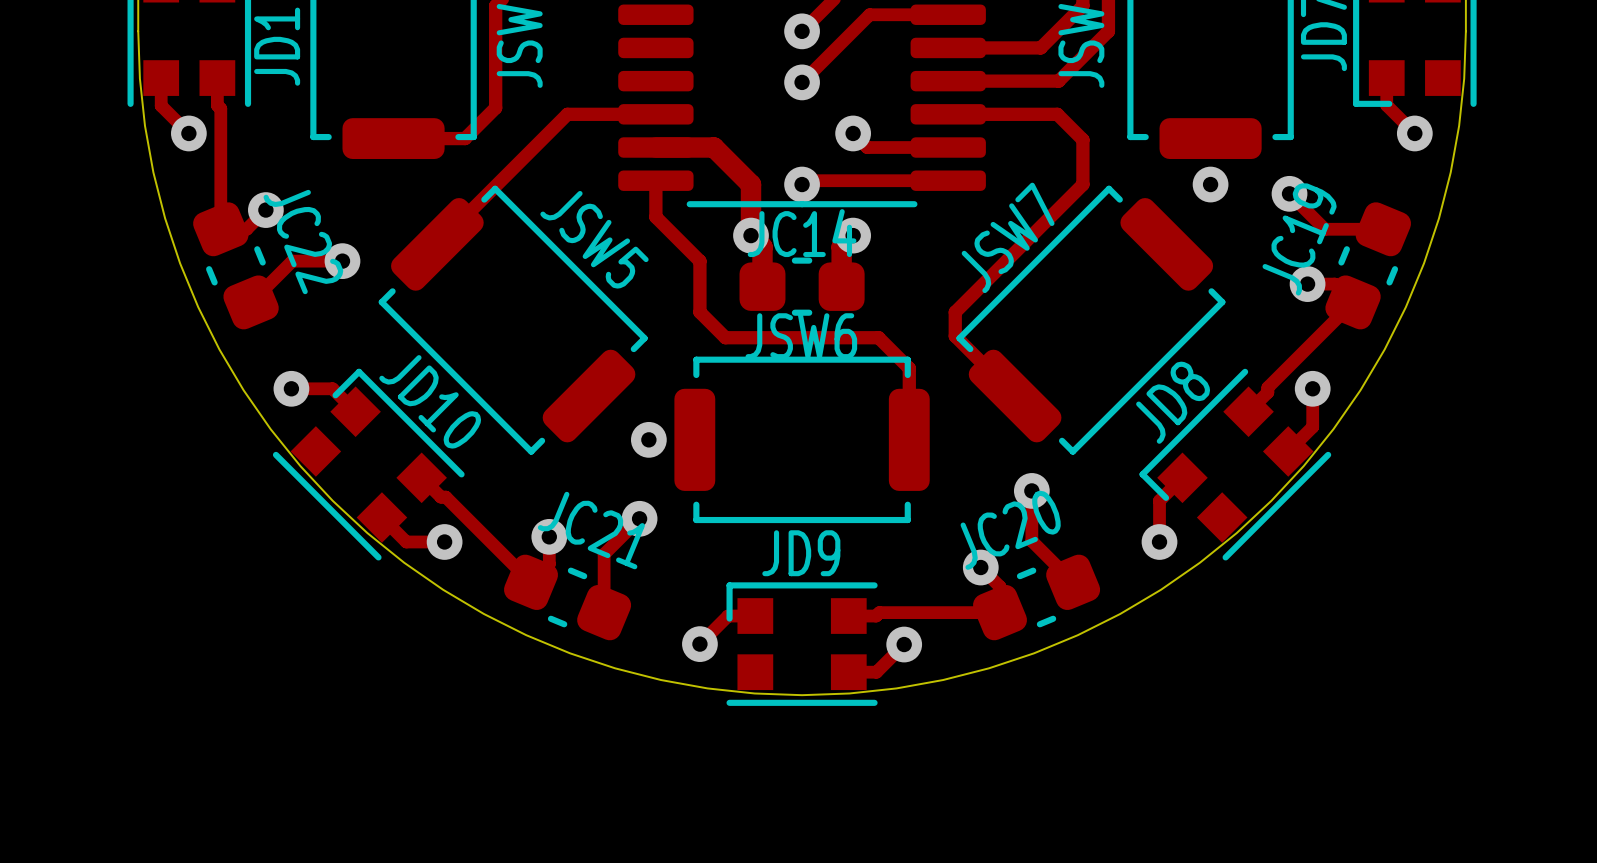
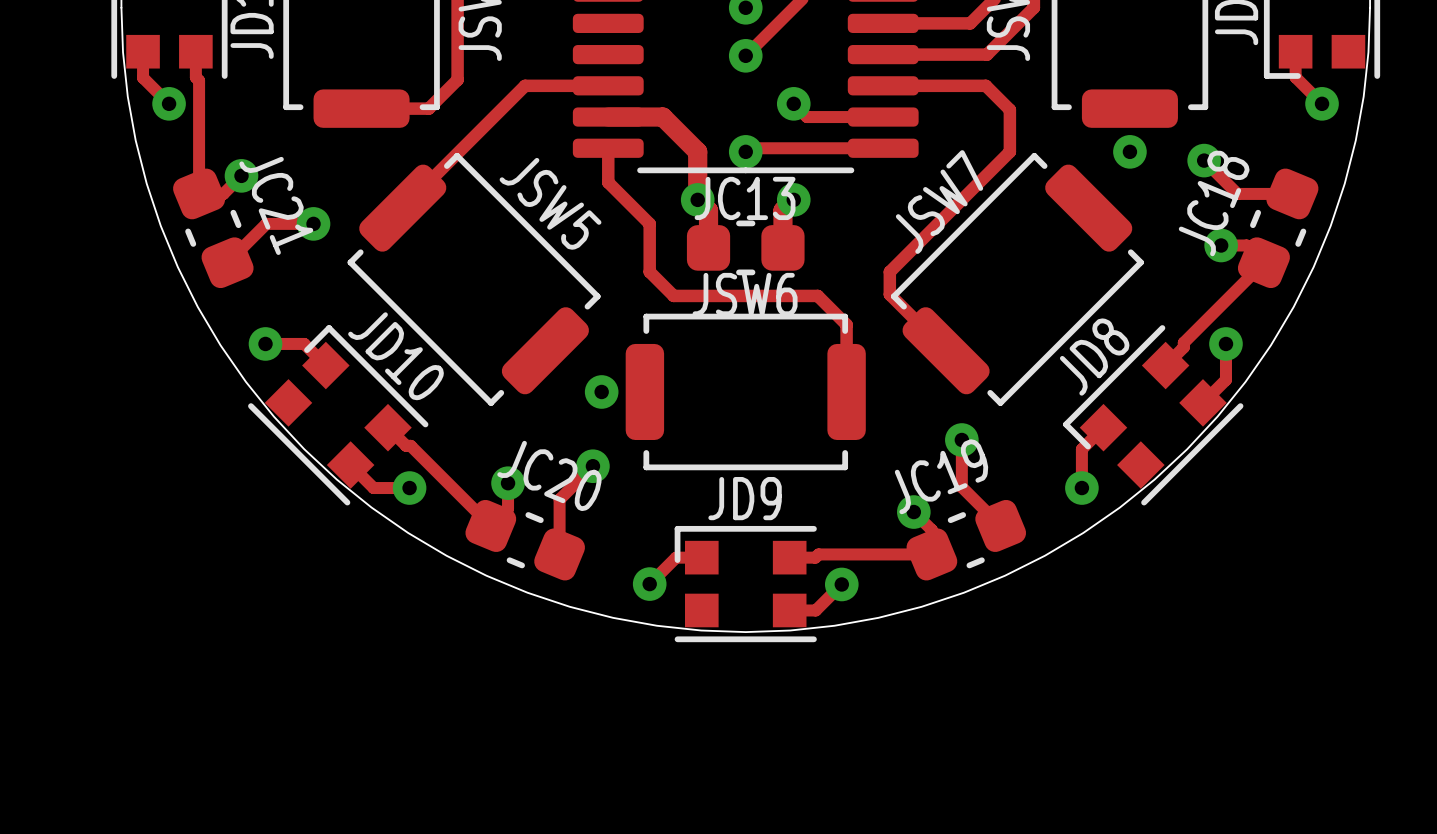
JC14 name: JC14 (802, 233) -> JC13 (745, 198)
JC19 name: JC19 (1299, 239) -> JC18 (1214, 203)
JC22 name: JC22 (303, 242) -> JC21 (276, 205)
JC21 name: JC21 (591, 530) -> JC20 (549, 475)
JC20 name: JC20 (1010, 530) -> JC19 (941, 476)

